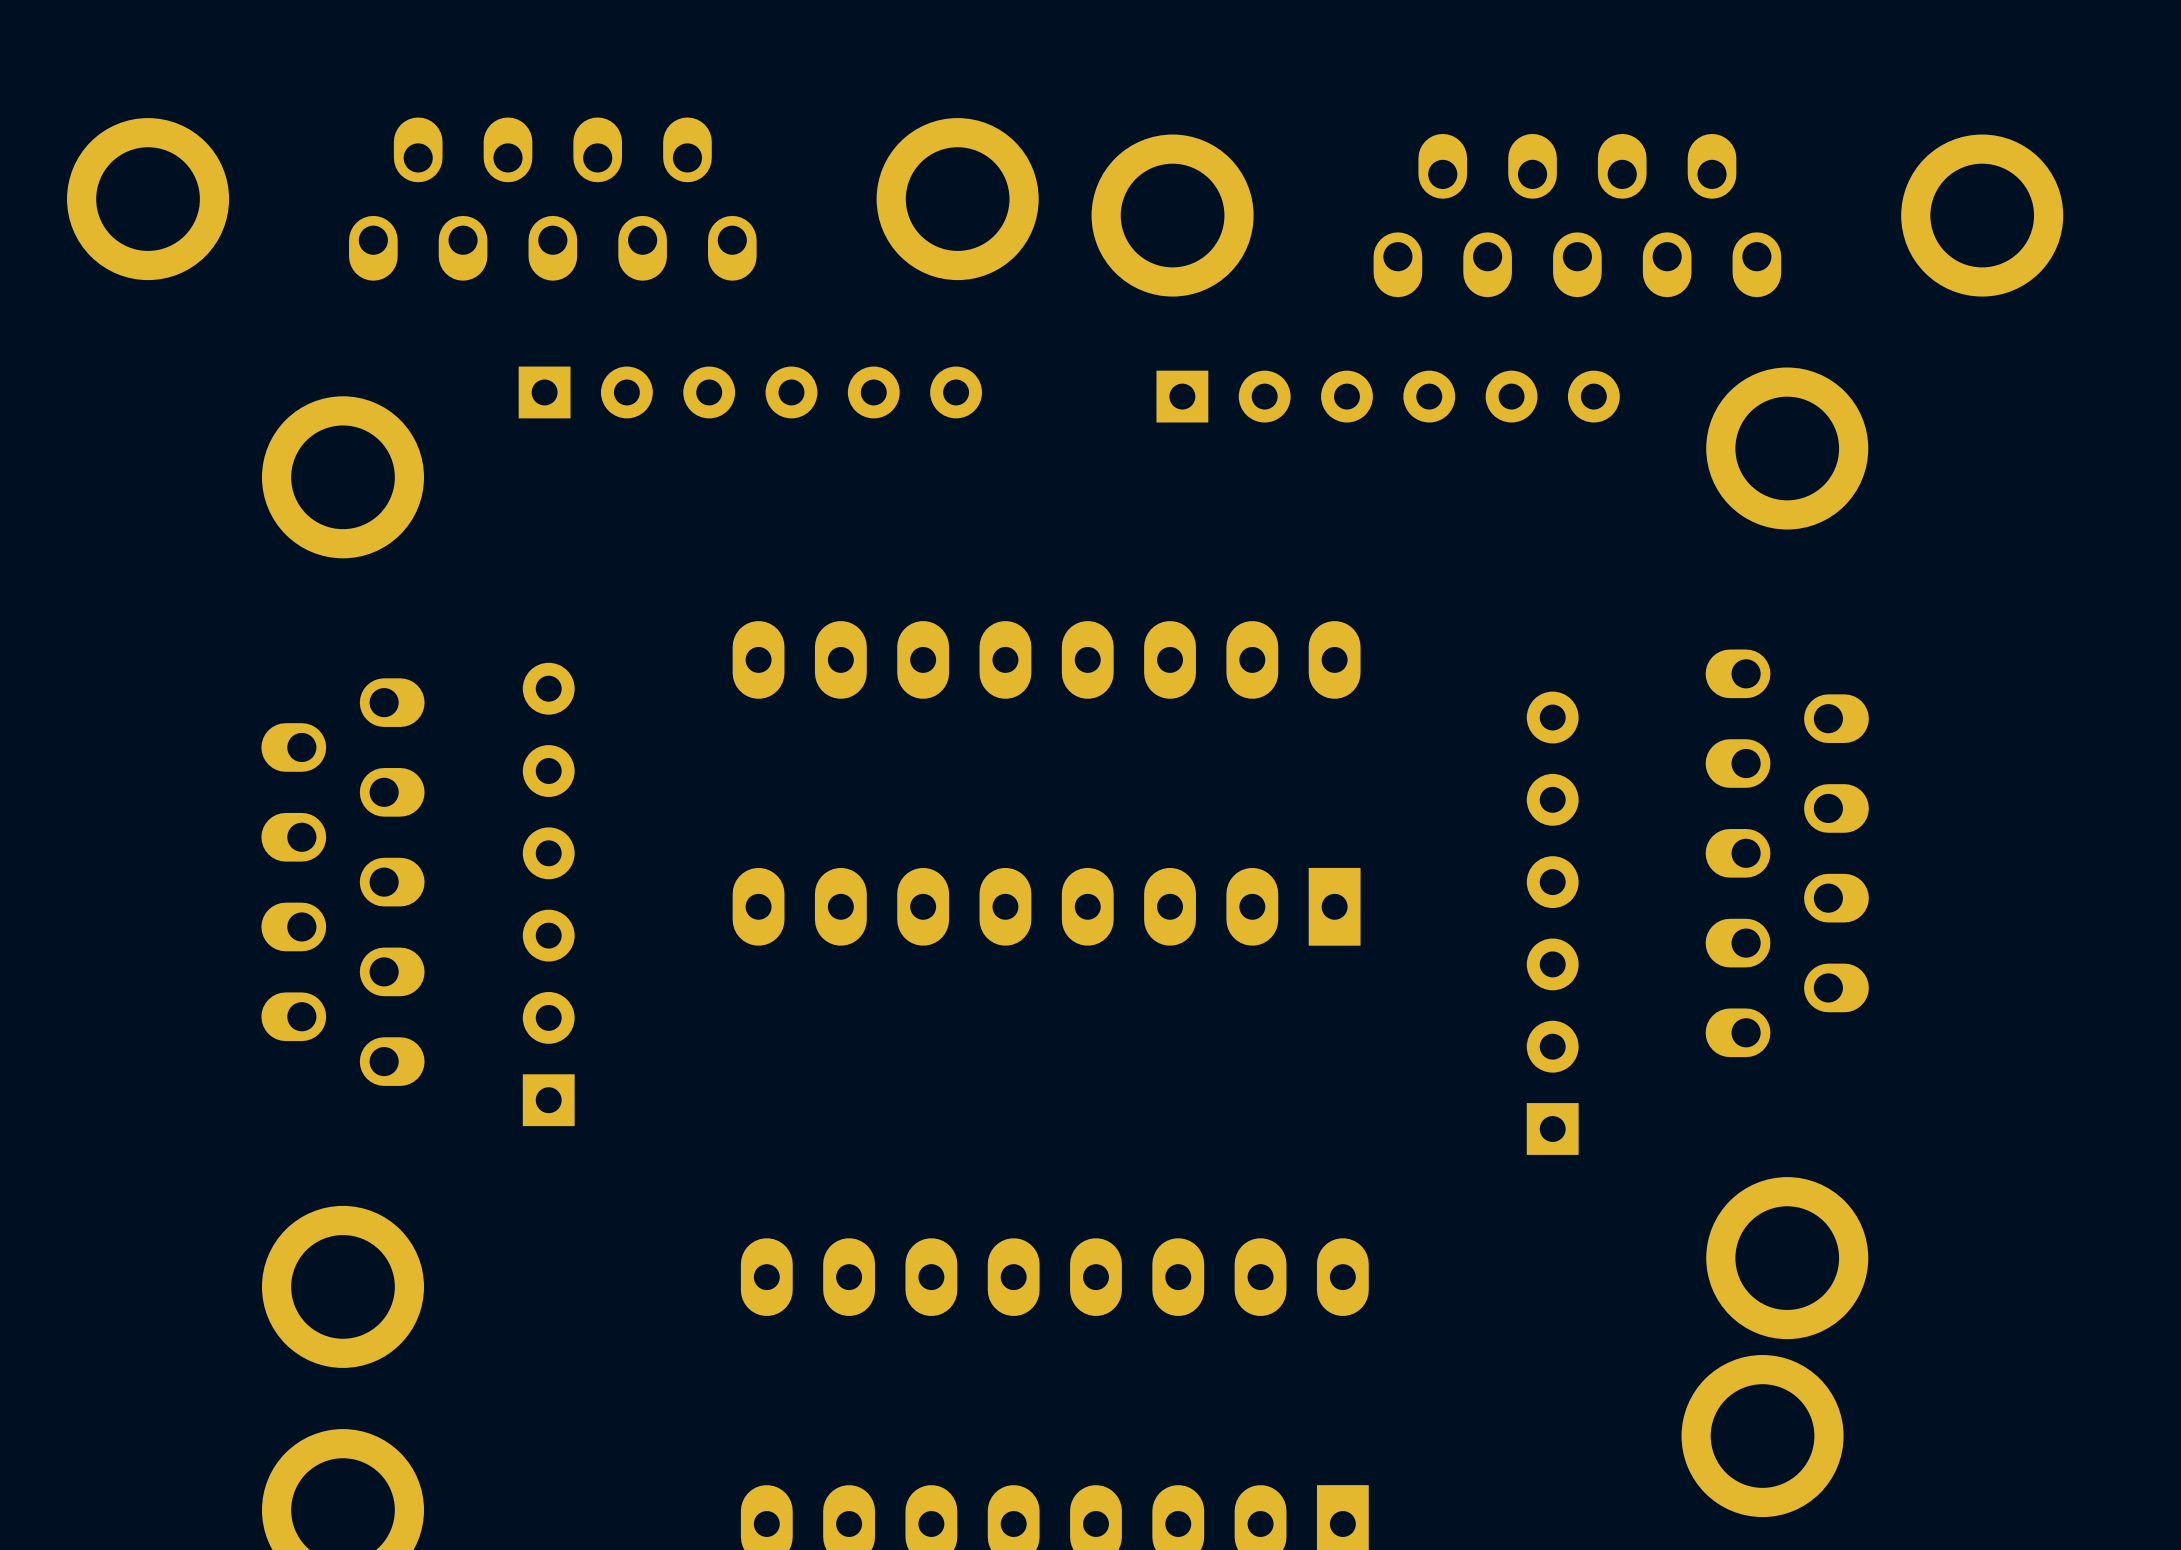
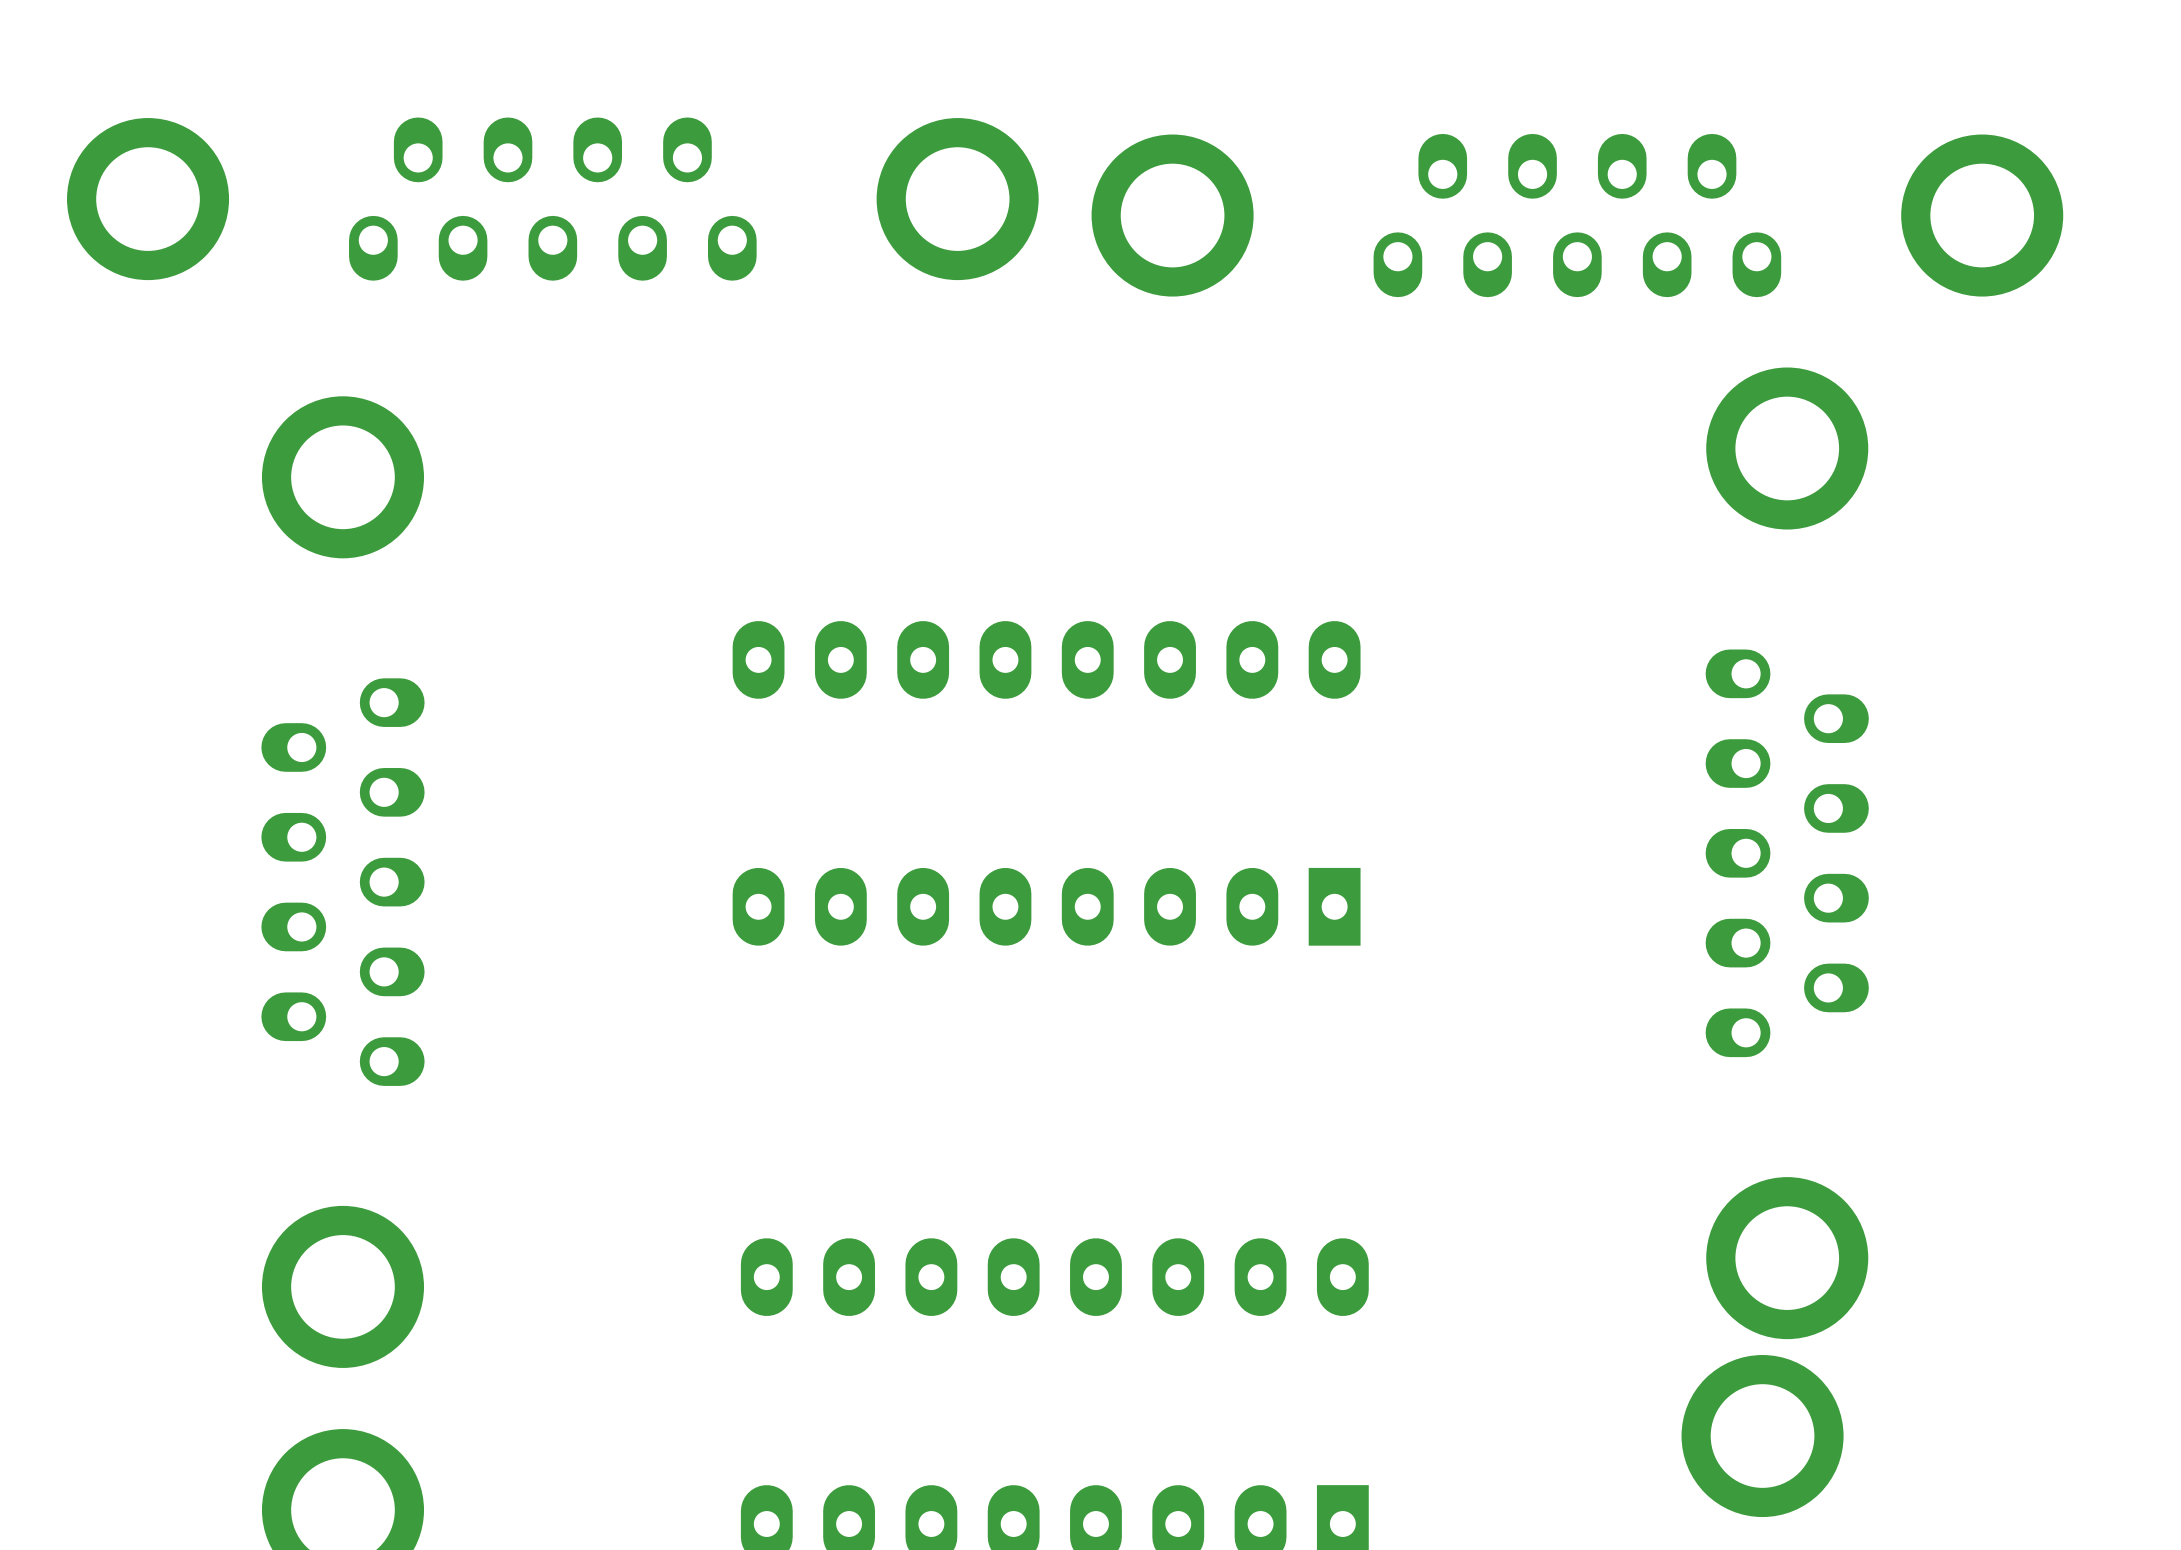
part: (750, 392) -> none
part: (1388, 396) -> none
part: (548, 894) -> none
part: (1552, 923) -> none

